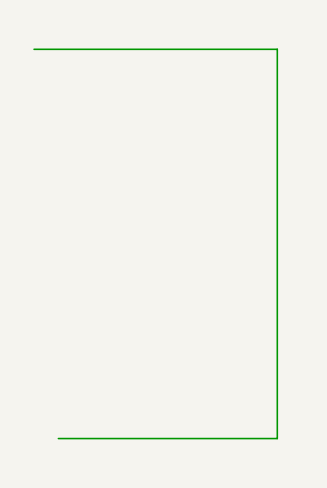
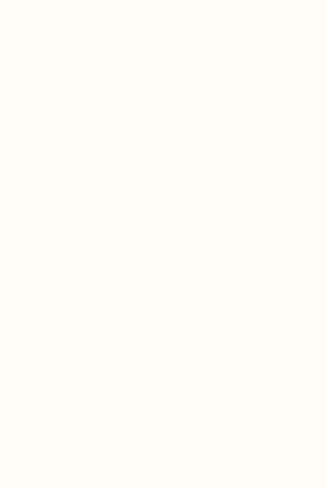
wire: (34, 49) (277, 49) (277, 438) (58, 438) -> none

